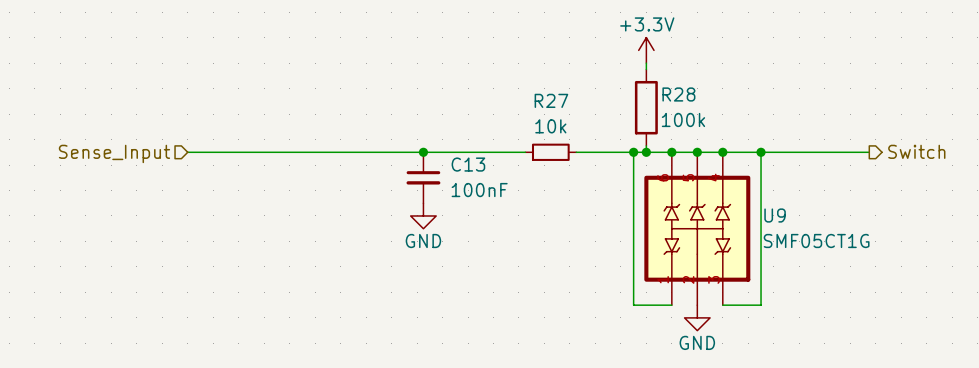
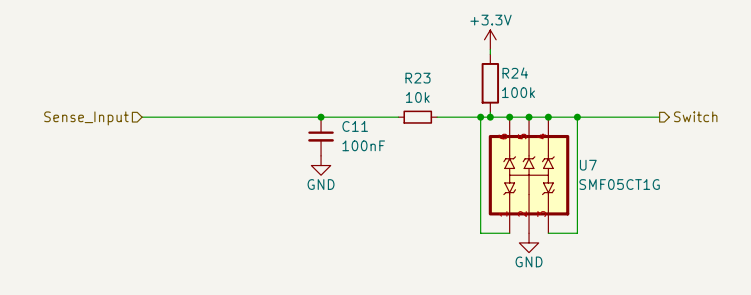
R28 name: R28 (678, 94) -> R24 (515, 73)
R27 name: R27 (551, 100) -> R23 (418, 78)
C13 name: C13 (468, 164) -> C11 (355, 126)
U9 name: U9 (775, 215) -> U7 (588, 165)

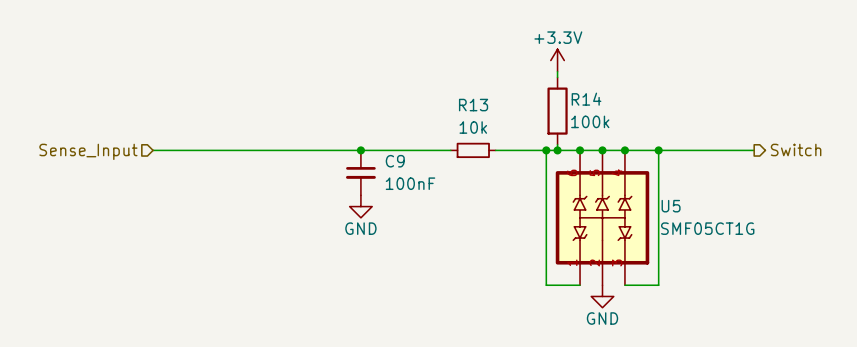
R24 name: R24 (515, 73) -> R14 (586, 99)
R23 name: R23 (418, 78) -> R13 (473, 105)
C11 name: C11 (355, 126) -> C9 (395, 161)
U7 name: U7 (588, 165) -> U5 (671, 206)

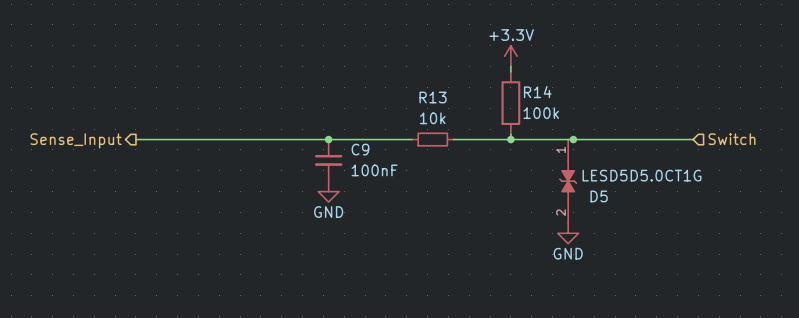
hierarchical label shape: output (796, 149) -> input (731, 139)
wire: (546, 150) (546, 285) (580, 285) -> none
junction: (546, 150) -> none
junction: (580, 150) -> none
junction: (602, 150) -> none
wire: (658, 150) (658, 285) (624, 285) -> none
junction: (658, 150) -> none
hierarchical label shape: input (88, 151) -> output (76, 140)
D5: none -> LESD5D5.0CT1G (568, 181)
U5: SMF05CT1G (602, 217) -> none
power symbol position: GND (602, 296) -> GND (568, 233)

